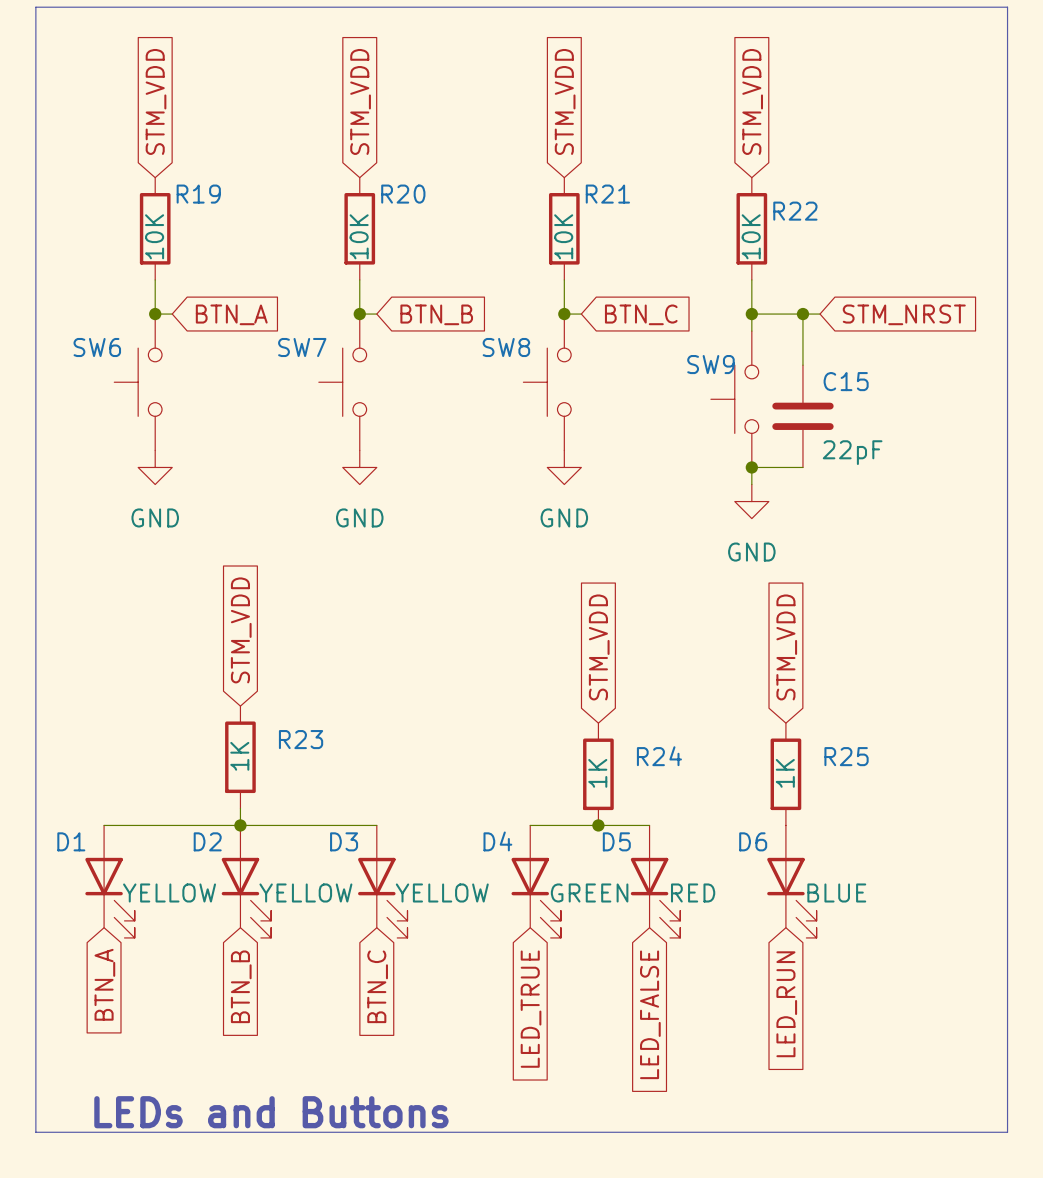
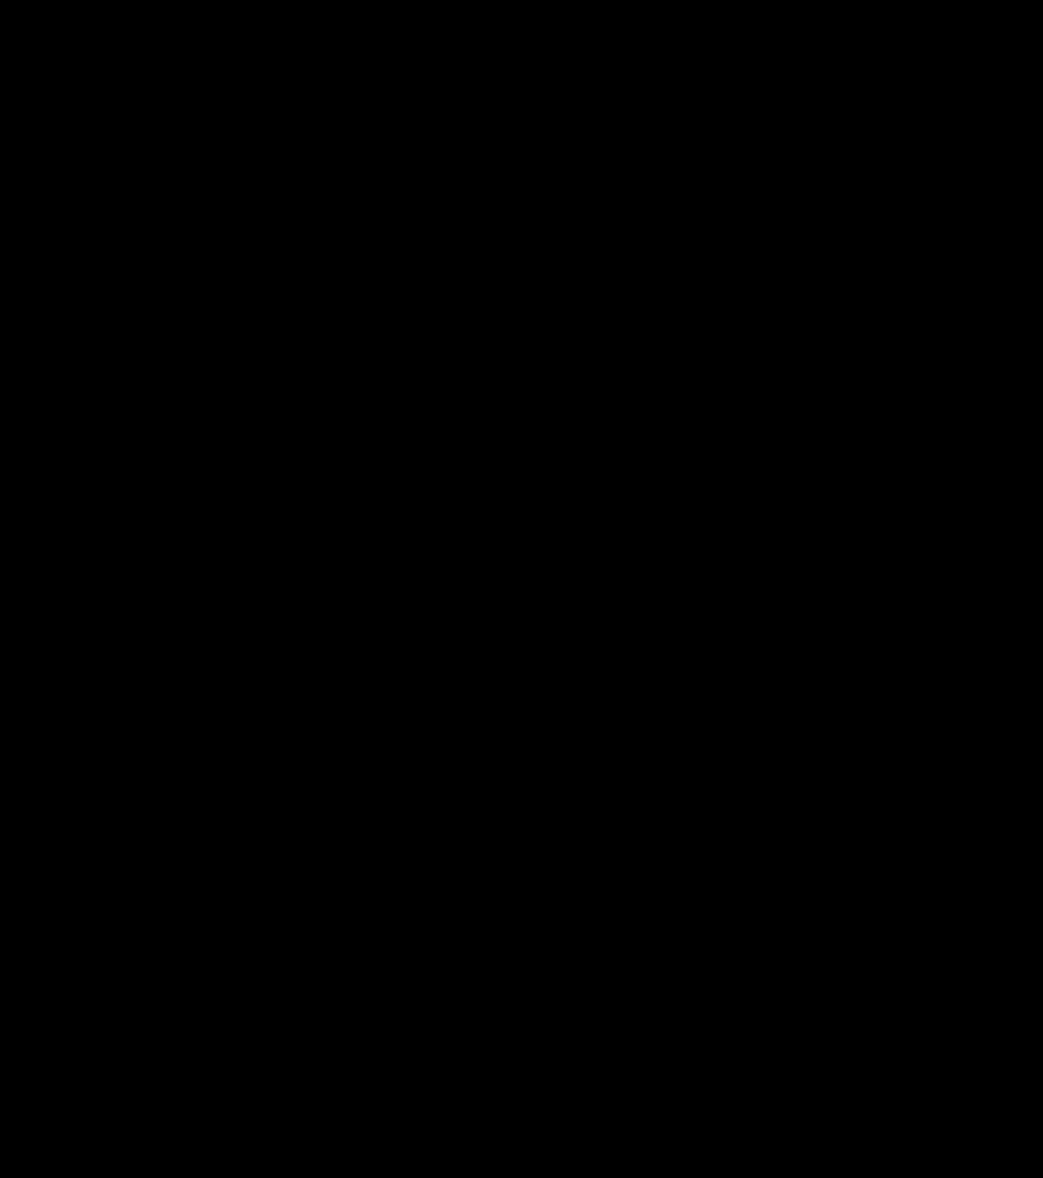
line: (35, 7) (35, 1132) (1007, 1132) (1007, 7) (35, 7) -> none
global label: STM_VDD (156, 101) -> none
global label: STM_VDD (360, 101) -> none
global label: STM_VDD (565, 101) -> none
global label: STM_VDD (752, 101) -> none
R19: 10K (155, 228) -> none
R20: 10K (359, 228) -> none
R21: 10K (564, 228) -> none
R22: 10K (751, 228) -> none
wire: (155, 279) (155, 314) (172, 314) -> none
wire: (359, 279) (359, 314) (376, 314) -> none
wire: (564, 279) (564, 314) (581, 314) -> none
wire: (751, 279) (751, 331) -> none
junction: (155, 314) -> none
global label: BTN_A (231, 314) -> none
junction: (359, 314) -> none
global label: BTN_B (436, 314) -> none
junction: (564, 314) -> none
global label: BTN_C (641, 314) -> none
wire: (751, 314) (820, 314) -> none
junction: (751, 314) -> none
wire: (802, 314) (802, 365) -> none
junction: (802, 314) -> none
global label: STM_NRST (904, 314) -> none
SW6: (138, 382) -> none
SW7: (342, 382) -> none
SW8: (547, 382) -> none
SW9: (734, 399) -> none
C15: 22pF (802, 416) -> none
power symbol: GND (155, 467) -> none
power symbol: GND (359, 467) -> none
power symbol: GND (564, 467) -> none
junction: (751, 467) -> none
wire: (802, 467) (751, 467) (751, 484) -> none
power symbol: GND (751, 501) -> none
global label: STM_VDD (241, 630) -> none
global label: STM_VDD (599, 647) -> none
global label: STM_VDD (786, 647) -> none
R23: 1K (240, 757) -> none
R24: 1K (598, 774) -> none
R25: 1K (785, 774) -> none
wire: (240, 808) (240, 825) -> none
wire: (104, 825) (376, 825) -> none
junction: (240, 825) -> none
wire: (530, 825) (649, 825) -> none
junction: (598, 825) -> none
D1: YELLOW (110, 881) -> none
D2: YELLOW (246, 881) -> none
D3: YELLOW (382, 881) -> none
D4: GREEN (536, 881) -> none
D5: RED (655, 881) -> none
D6: BLUE (791, 881) -> none
global label: BTN_A (104, 984) -> none
global label: BTN_B (241, 986) -> none
global label: BTN_C (377, 986) -> none
global label: LED_RUN (786, 1004) -> none
global label: LED_TRUE (531, 1009) -> none
global label: LED_FALSE (650, 1014) -> none
text: LEDs and Buttons (271, 1112) -> none

